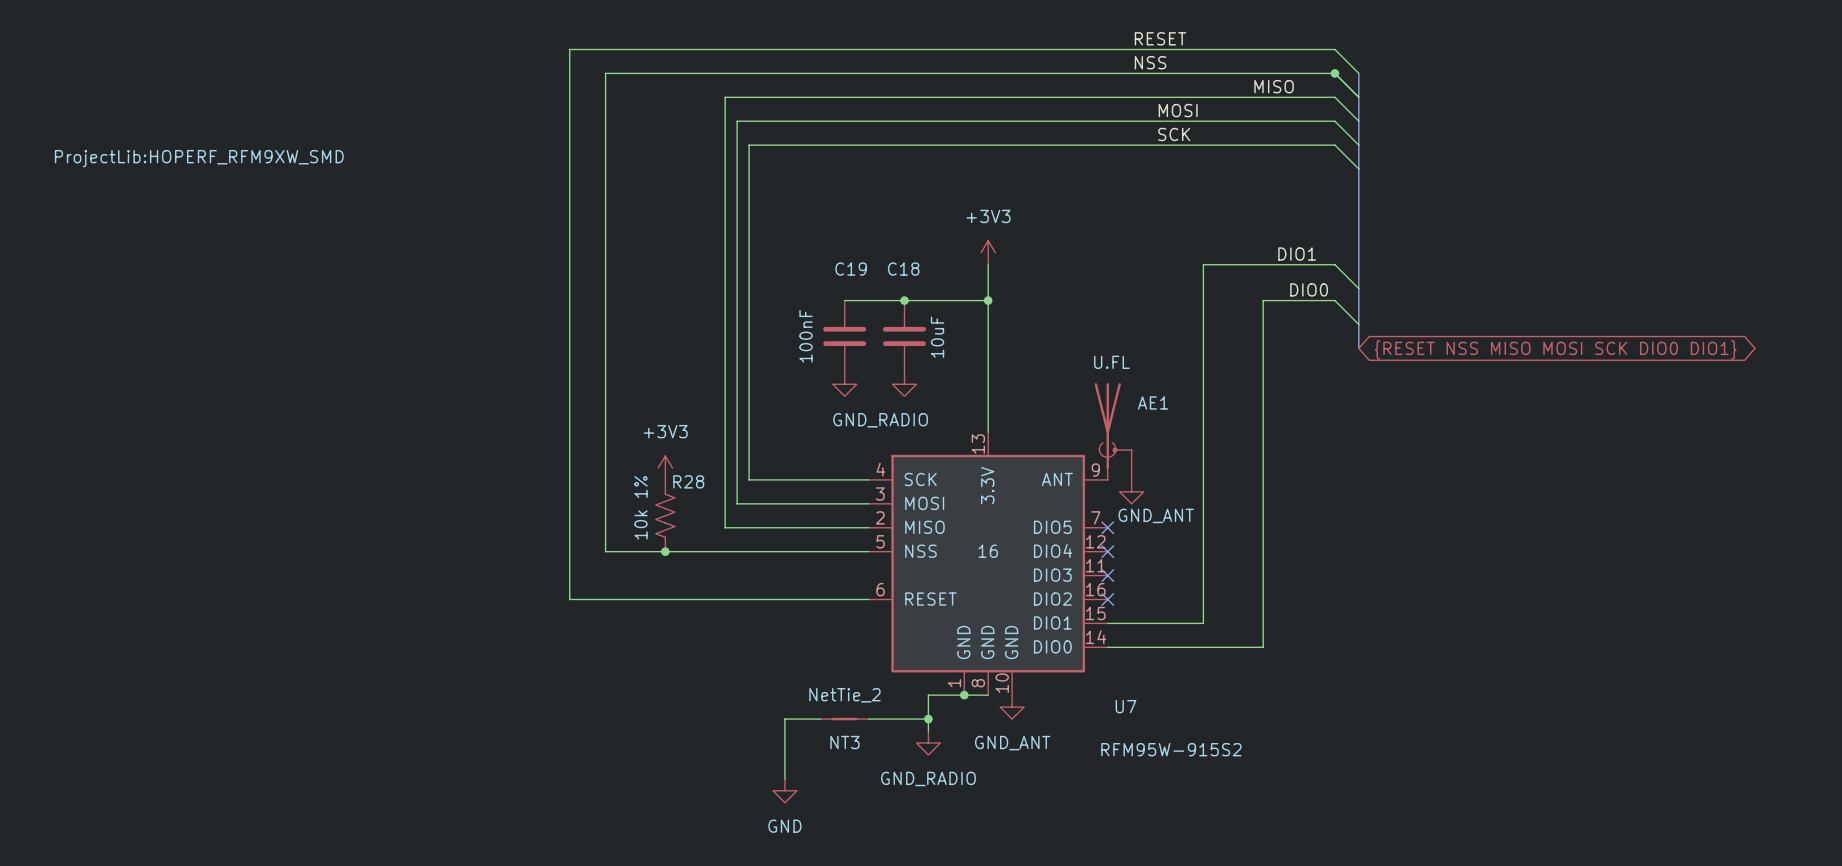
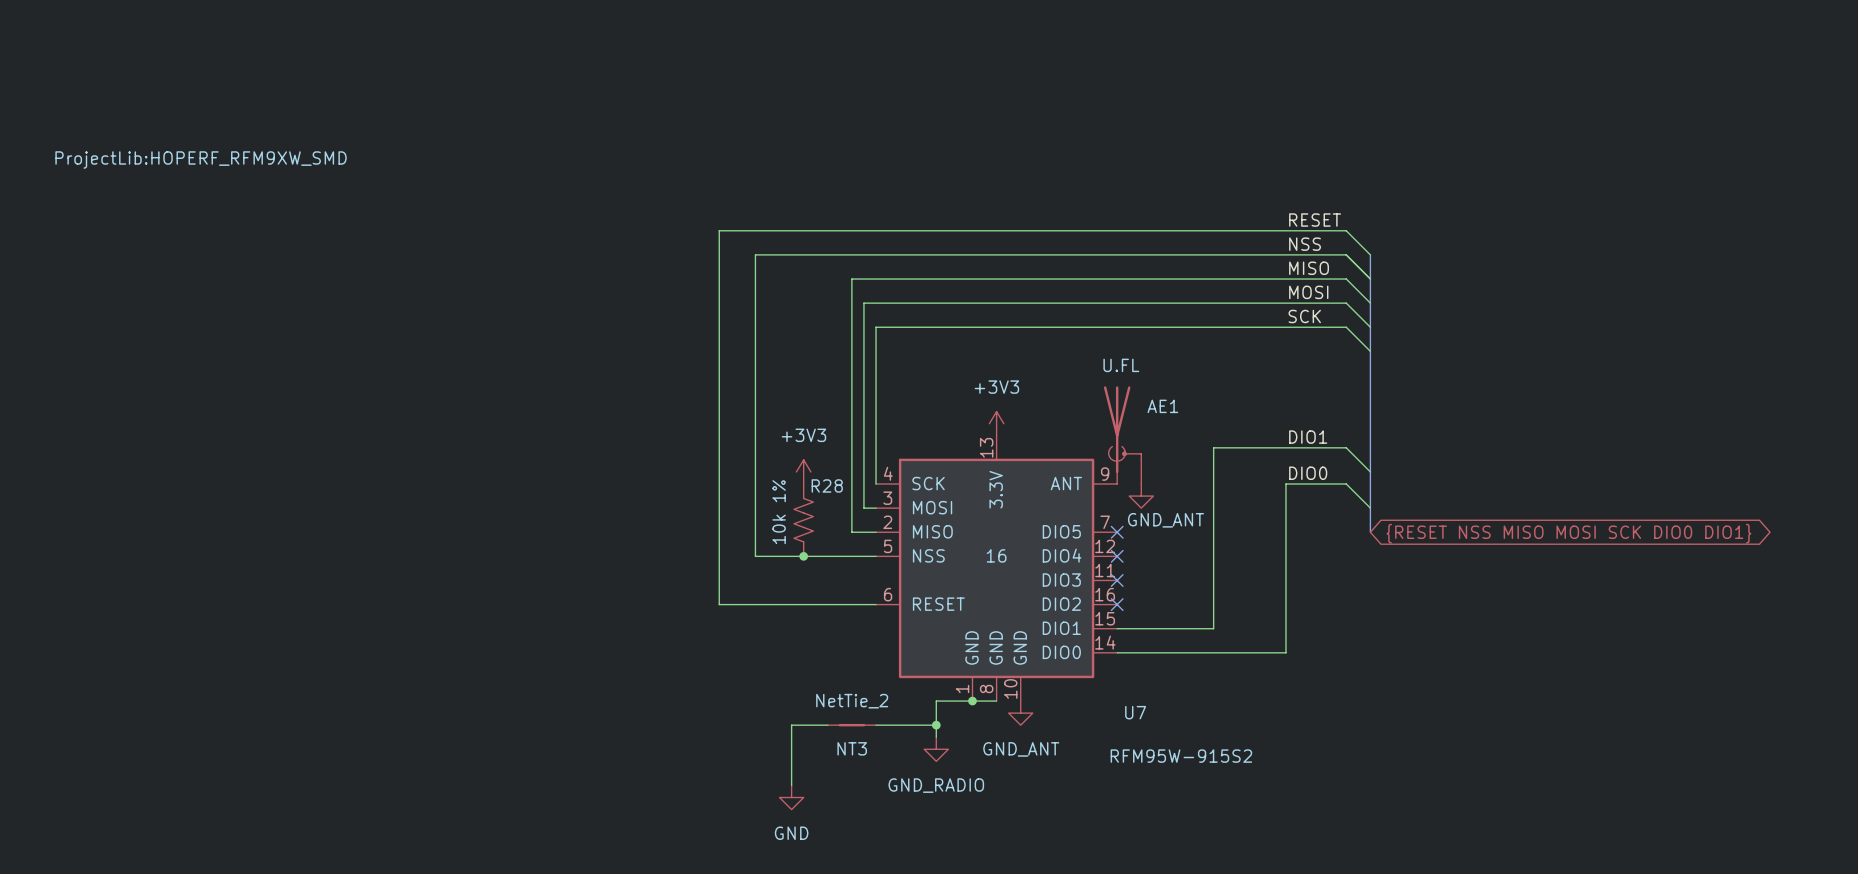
label position: RESET (1160, 38) -> RESET (1315, 220)
label position: NSS (1150, 62) -> NSS (1305, 244)
junction: (1334, 73) -> none
wire: (1358, 73) (1334, 49) (569, 49) (569, 599) (713, 599) -> (1370, 254) (1346, 230) (719, 230) (719, 604)
bus: (1358, 73) (1358, 252) -> none
label position: MISO (1274, 86) -> MISO (1309, 268)
wire: (1358, 97) (1334, 73) (605, 73) (605, 551) (749, 551) -> none
label position: MOSI (1178, 110) -> MOSI (1308, 292)
wire: (1358, 121) (1334, 97) (725, 97) (725, 527) (844, 527) -> (1370, 303) (1346, 279) (851, 279) (851, 532)
label position: SCK (1174, 134) -> SCK (1304, 316)
wire: (1358, 145) (1334, 121) (737, 121) (737, 503) (856, 503) -> none
wire: (1358, 169) (1334, 145) (749, 145) (749, 252) -> (1370, 279) (1346, 254) (755, 254)
power symbol: +3V3 (988, 252) -> none
label position: DIO1 (1297, 254) -> DIO1 (1308, 437)
wire: (988, 264) (988, 432) -> none
wire: (1358, 288) (1334, 264) (1203, 264) (1203, 444) -> (1370, 471) (1346, 447) (1213, 447)
label position: DIO0 (1309, 289) -> DIO0 (1308, 473)
wire: (844, 300) (856, 300) -> (863, 508) (863, 303)
junction: (904, 300) -> none
wire: none -> (996, 303) (1273, 303)
junction: (988, 300) -> none
wire: (1263, 300) (1263, 647) -> (1370, 508) (1346, 484) (1285, 484) (1285, 652) (1273, 652)
C19: 100nF (844, 336) -> none
C18: 10uF (904, 336) -> none
wire: none -> (1370, 351) (1346, 327) (876, 327) (876, 484)
bus: none -> (1370, 351) (1370, 532)
global label position: {RESET NSS MISO MOSI SCK DIO0 DIO1} (1555, 349) -> {RESET NSS MISO MOSI SCK DIO0 DIO1} (1568, 533)
power symbol: GND_RADIO (844, 384) -> none
power symbol: (904, 384) -> none
power symbol: none -> +3V3 (996, 423)
power symbol position: +3V3 (665, 467) -> +3V3 (803, 471)
wire: (749, 479) (868, 479) -> (755, 484) (755, 556)
R28 position: (665, 515) -> (803, 520)
junction: (665, 551) -> none
junction: none -> (803, 556)

